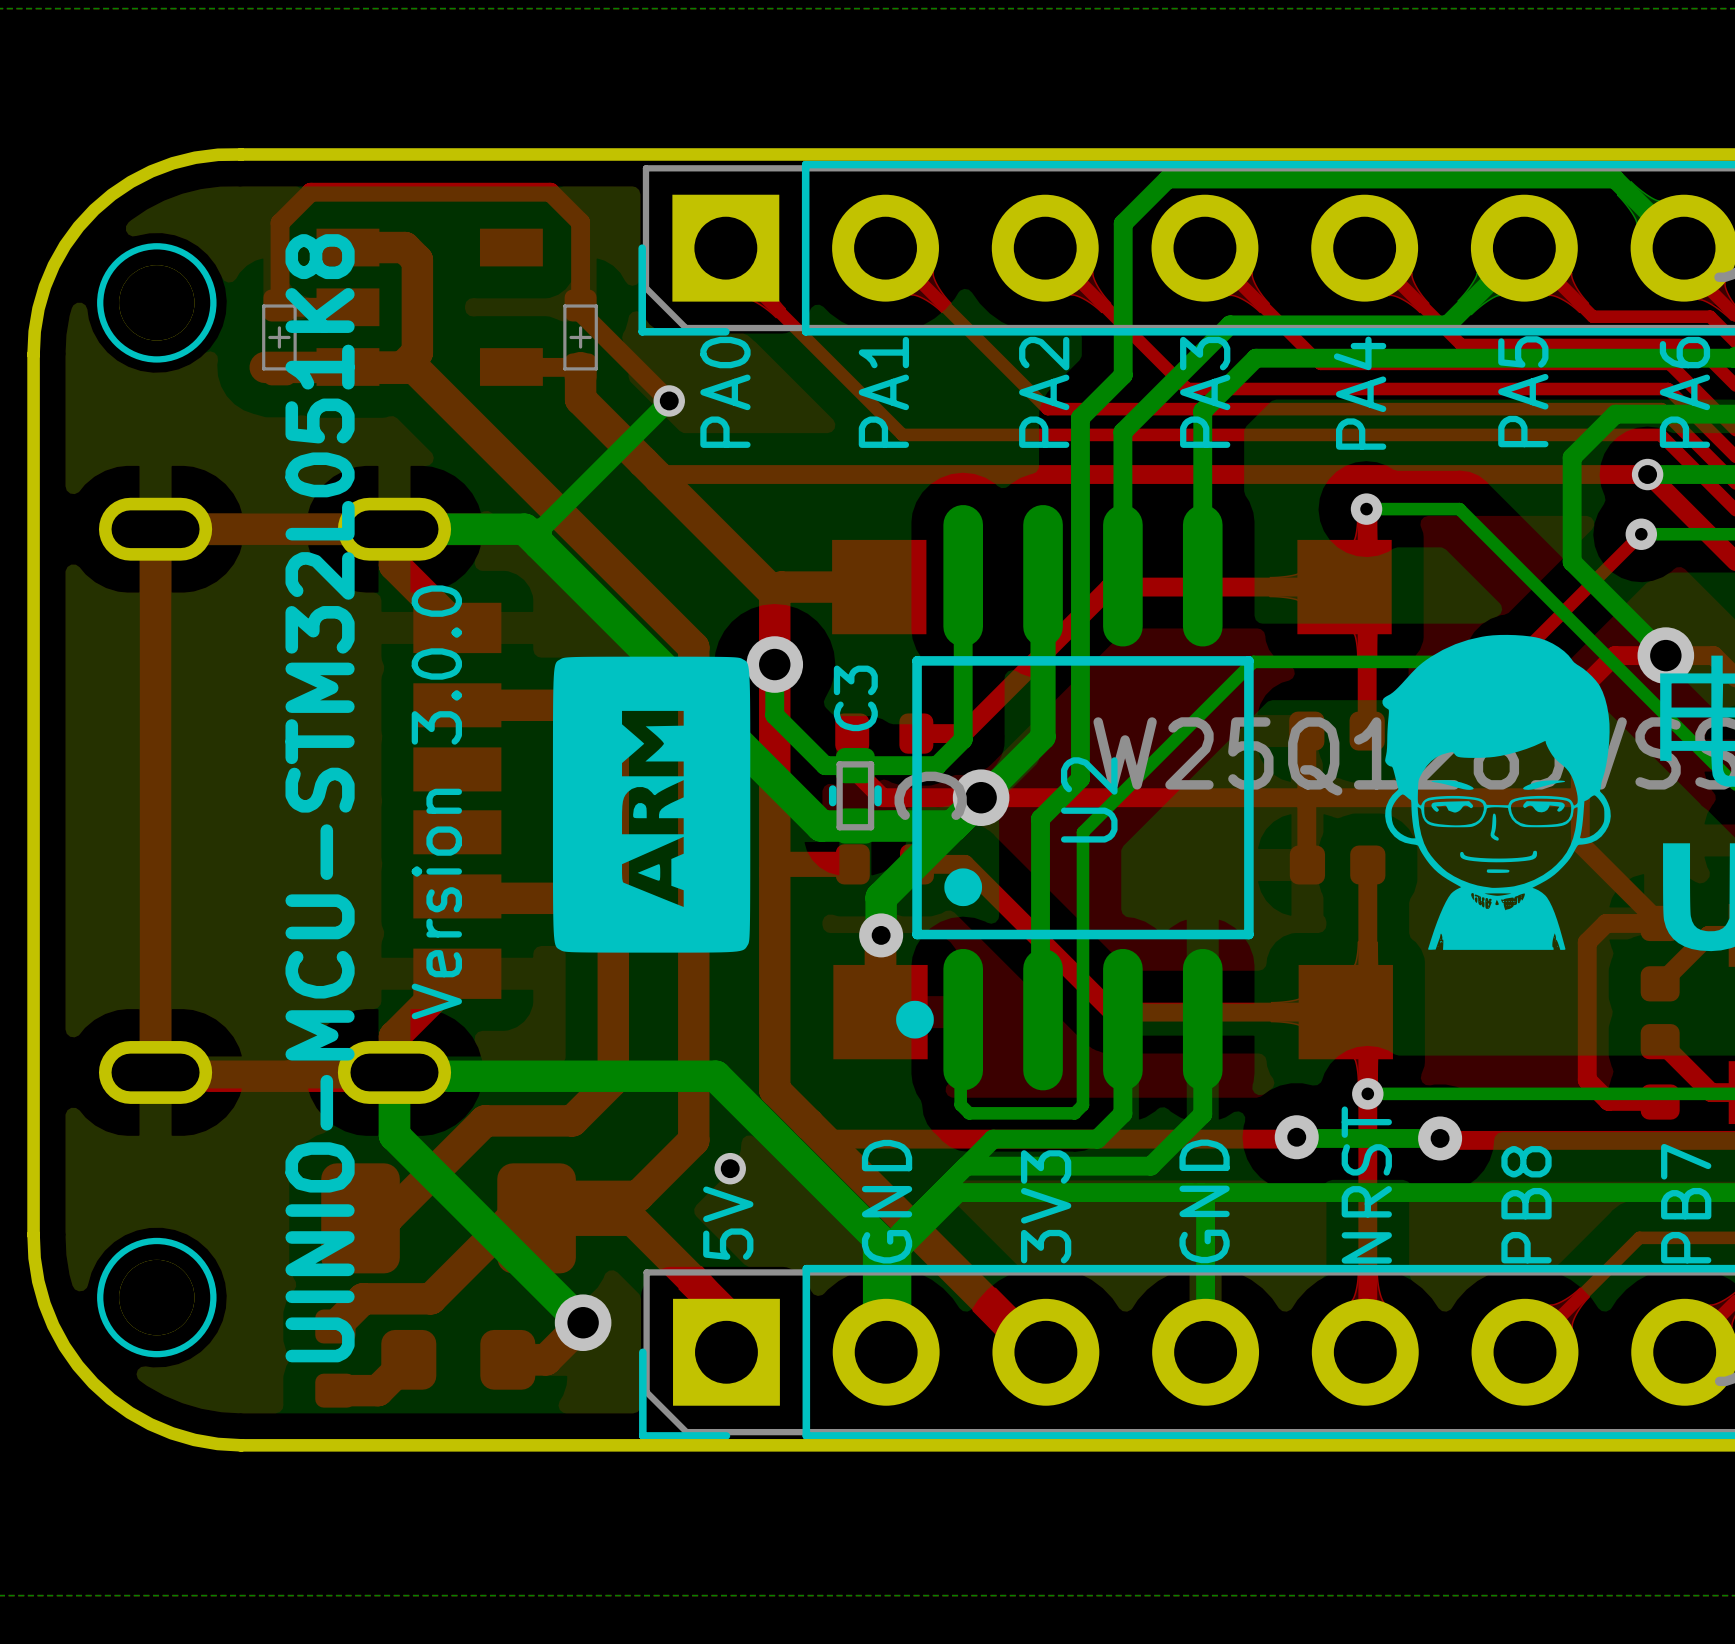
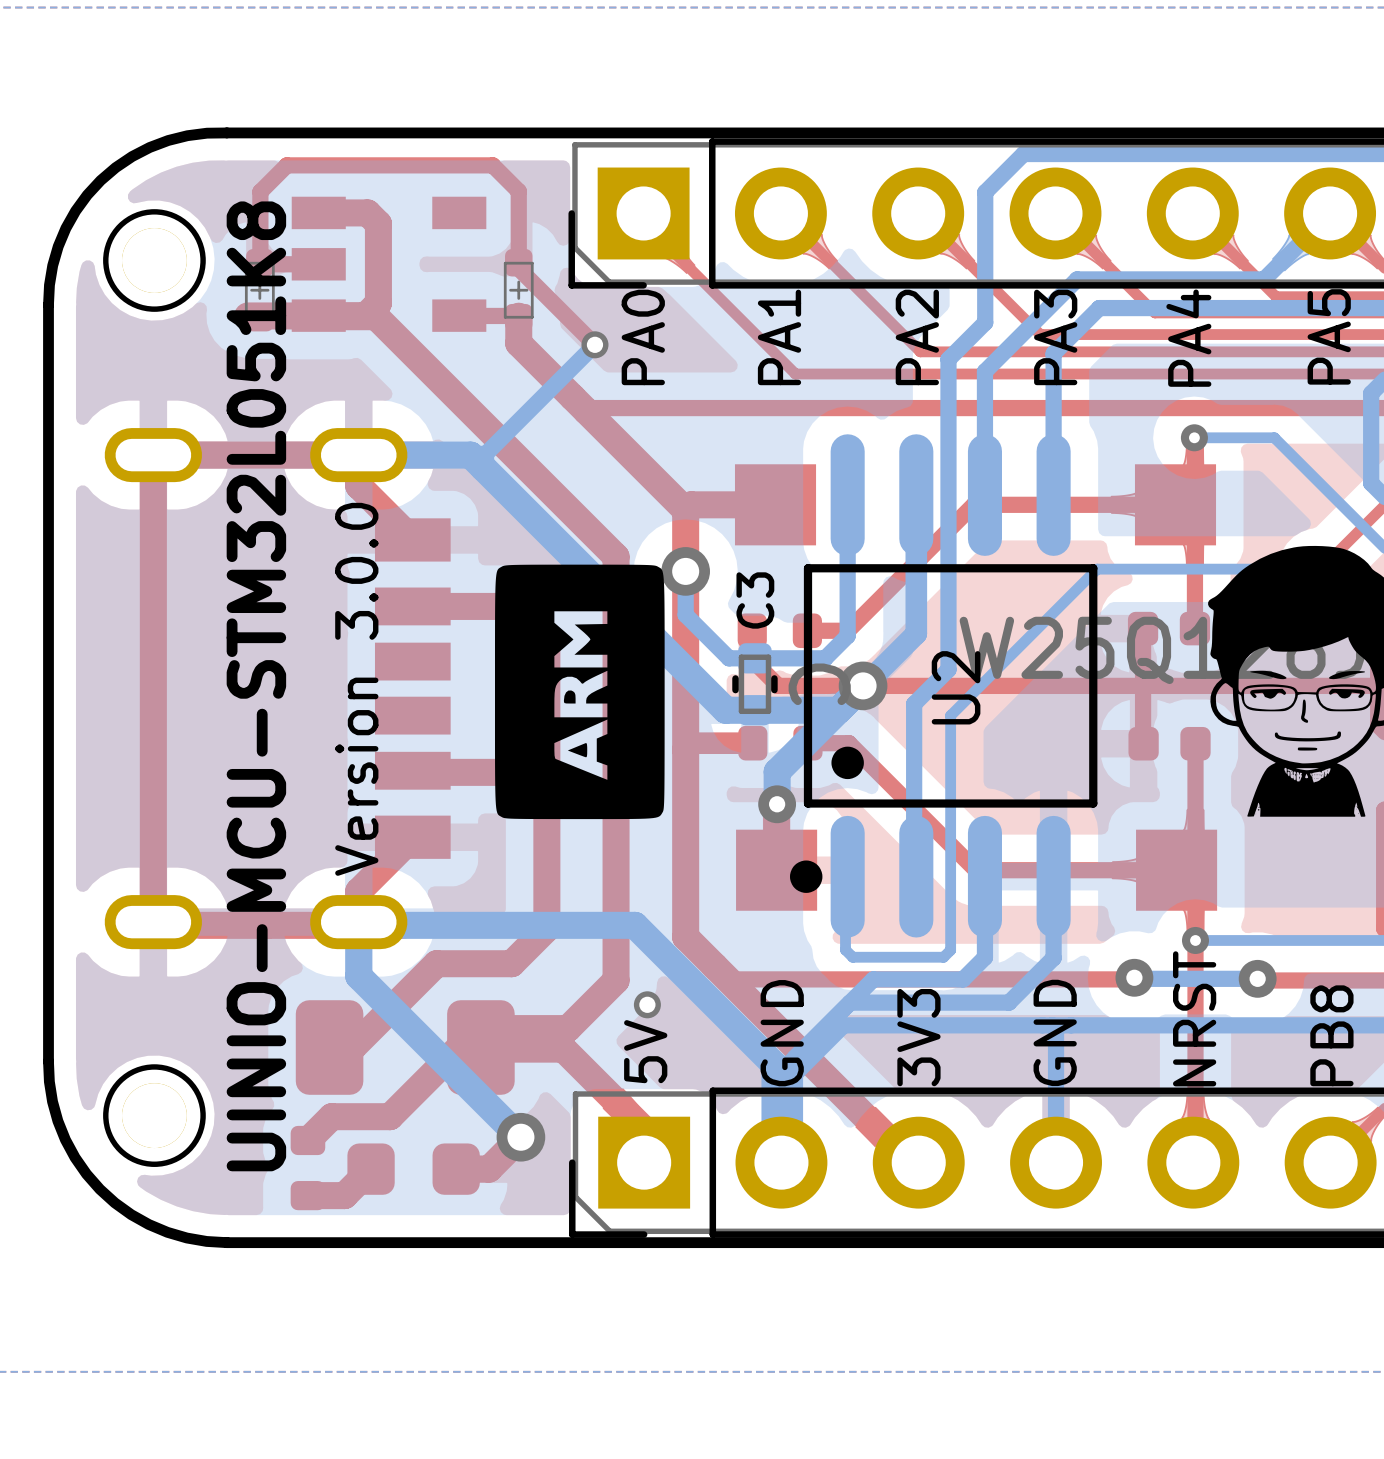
text position: UINIO-MCU-STM32L051K8 (320, 798) -> UINIO-MCU-STM32L051K8 (256, 686)
text position: Version 3.0.0 (436, 802) -> Version 3.0.0 (356, 689)

